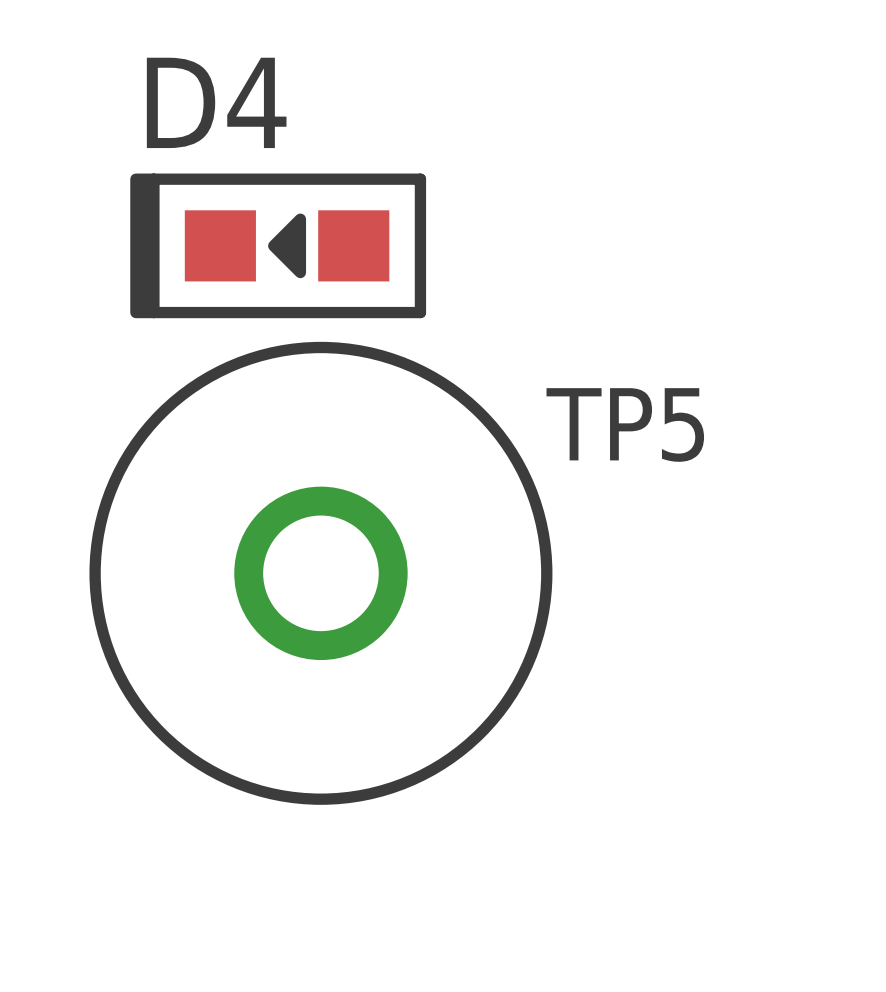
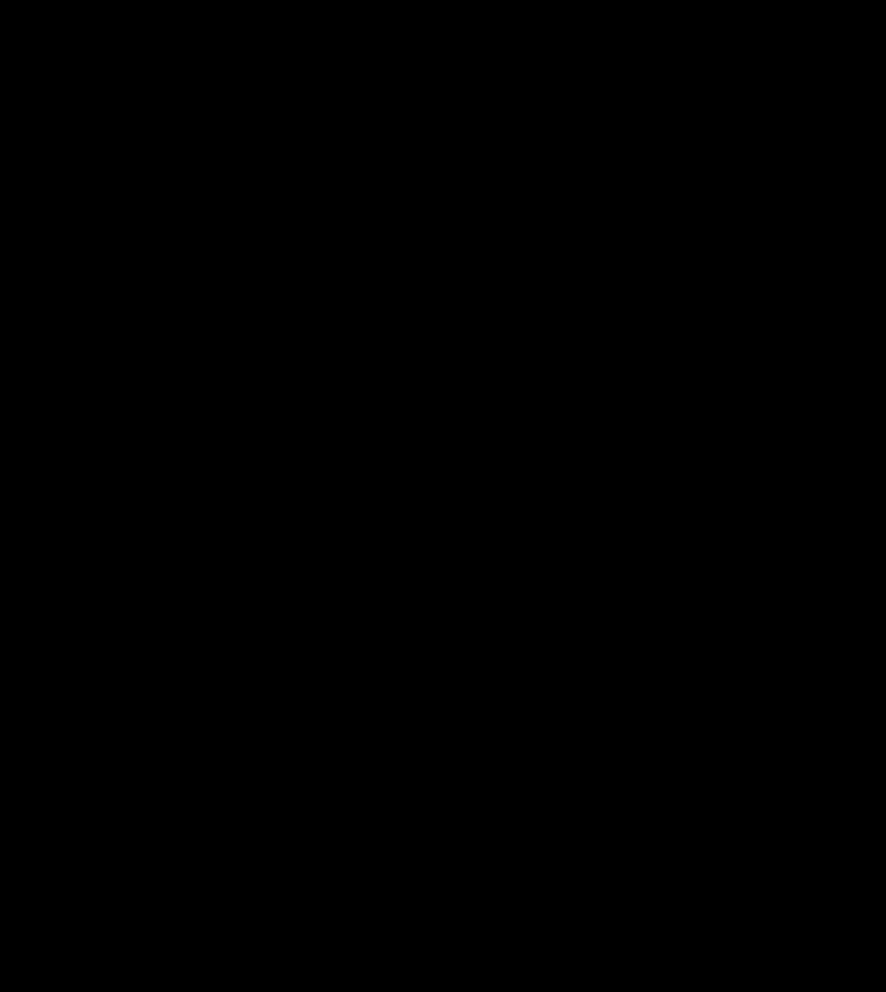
D4: (278, 245) -> none
TP5: (320, 573) -> none

